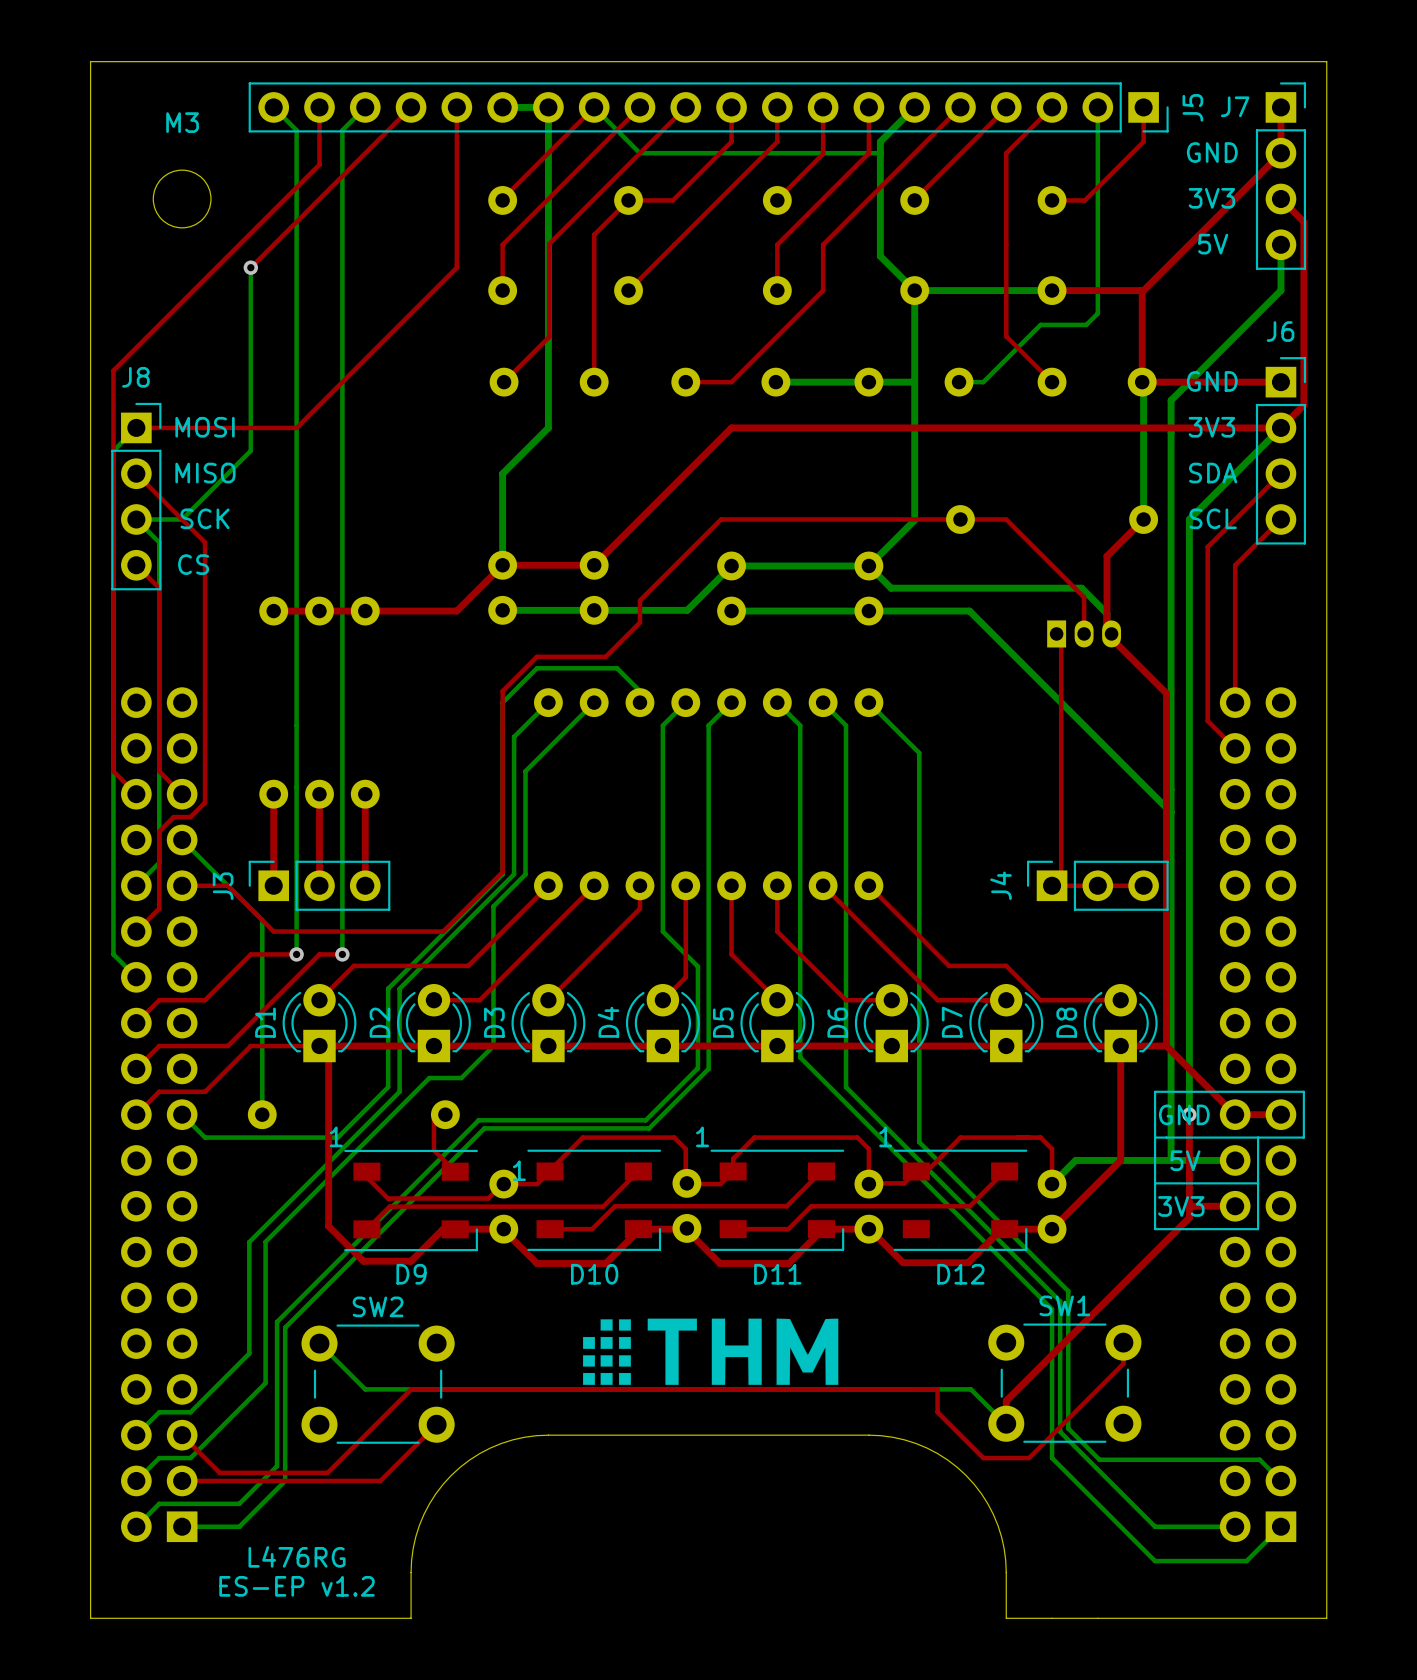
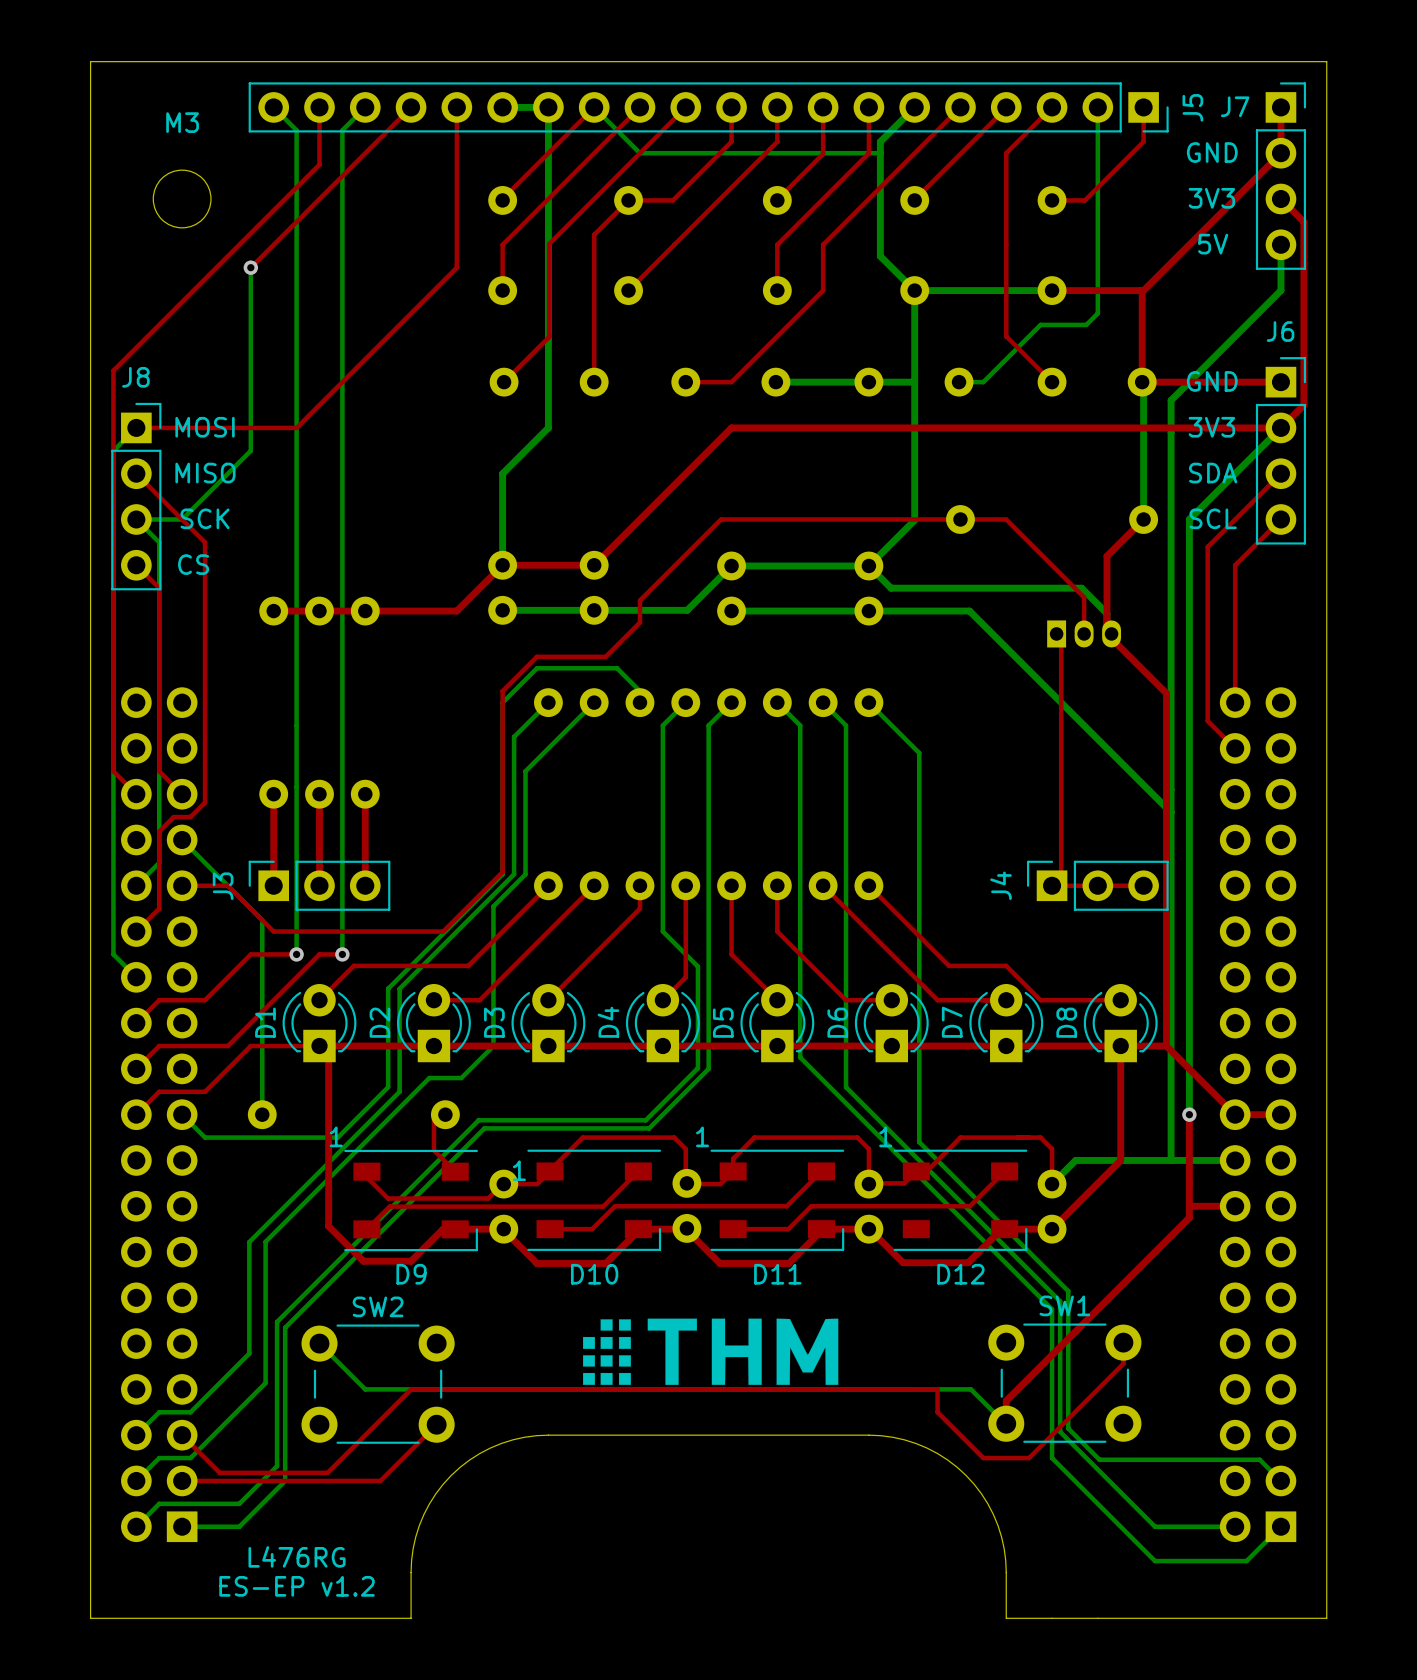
text: GND (1184, 1114) -> none
line: (1155, 1137) (1303, 1137) (1303, 1091) (1155, 1091) (1155, 1229) (1258, 1229) (1258, 1137) -> none
text: 5V (1185, 1160) -> none
line: (1155, 1183) (1258, 1183) -> none
text: 3V3 (1181, 1206) -> none

